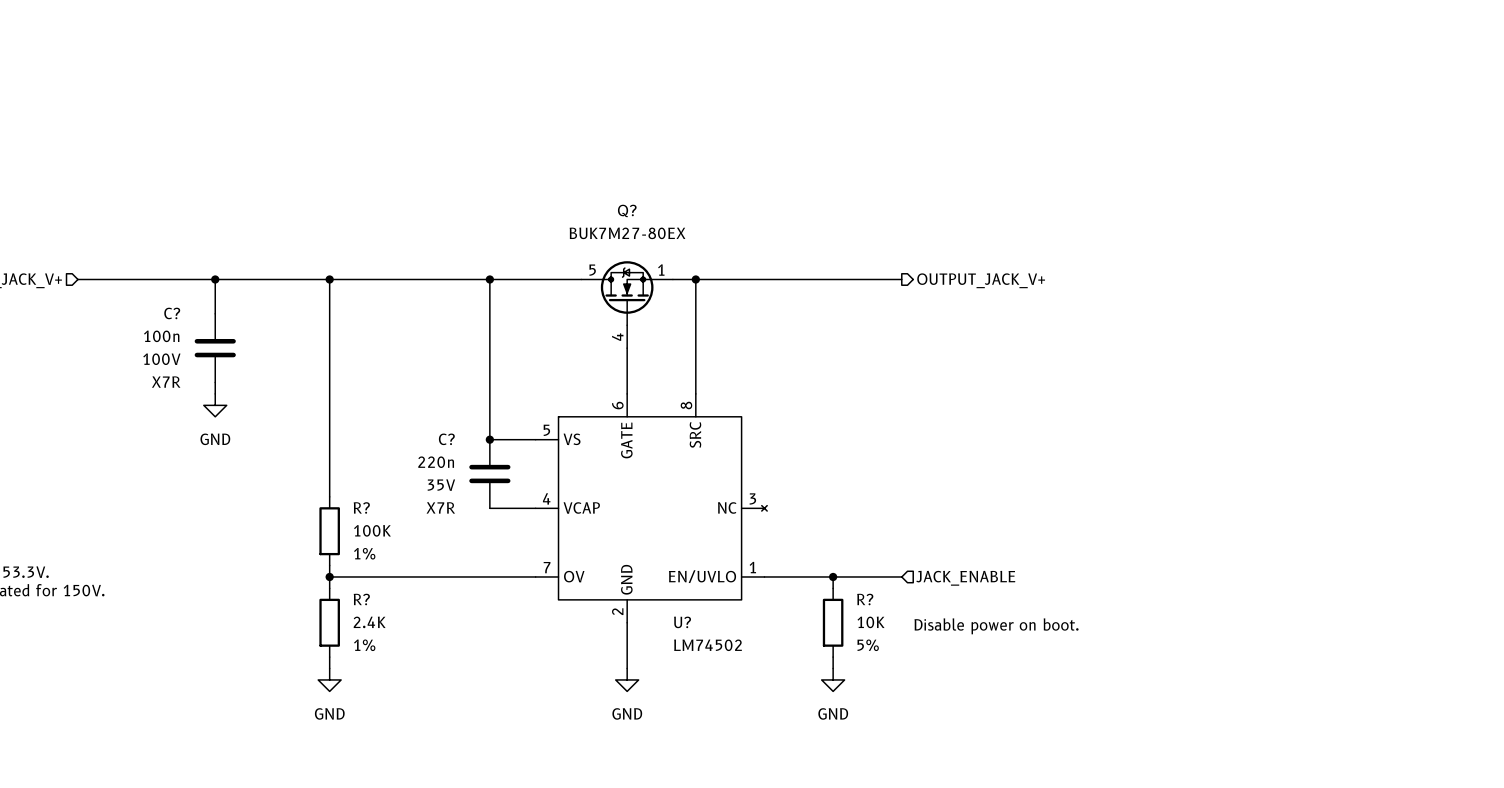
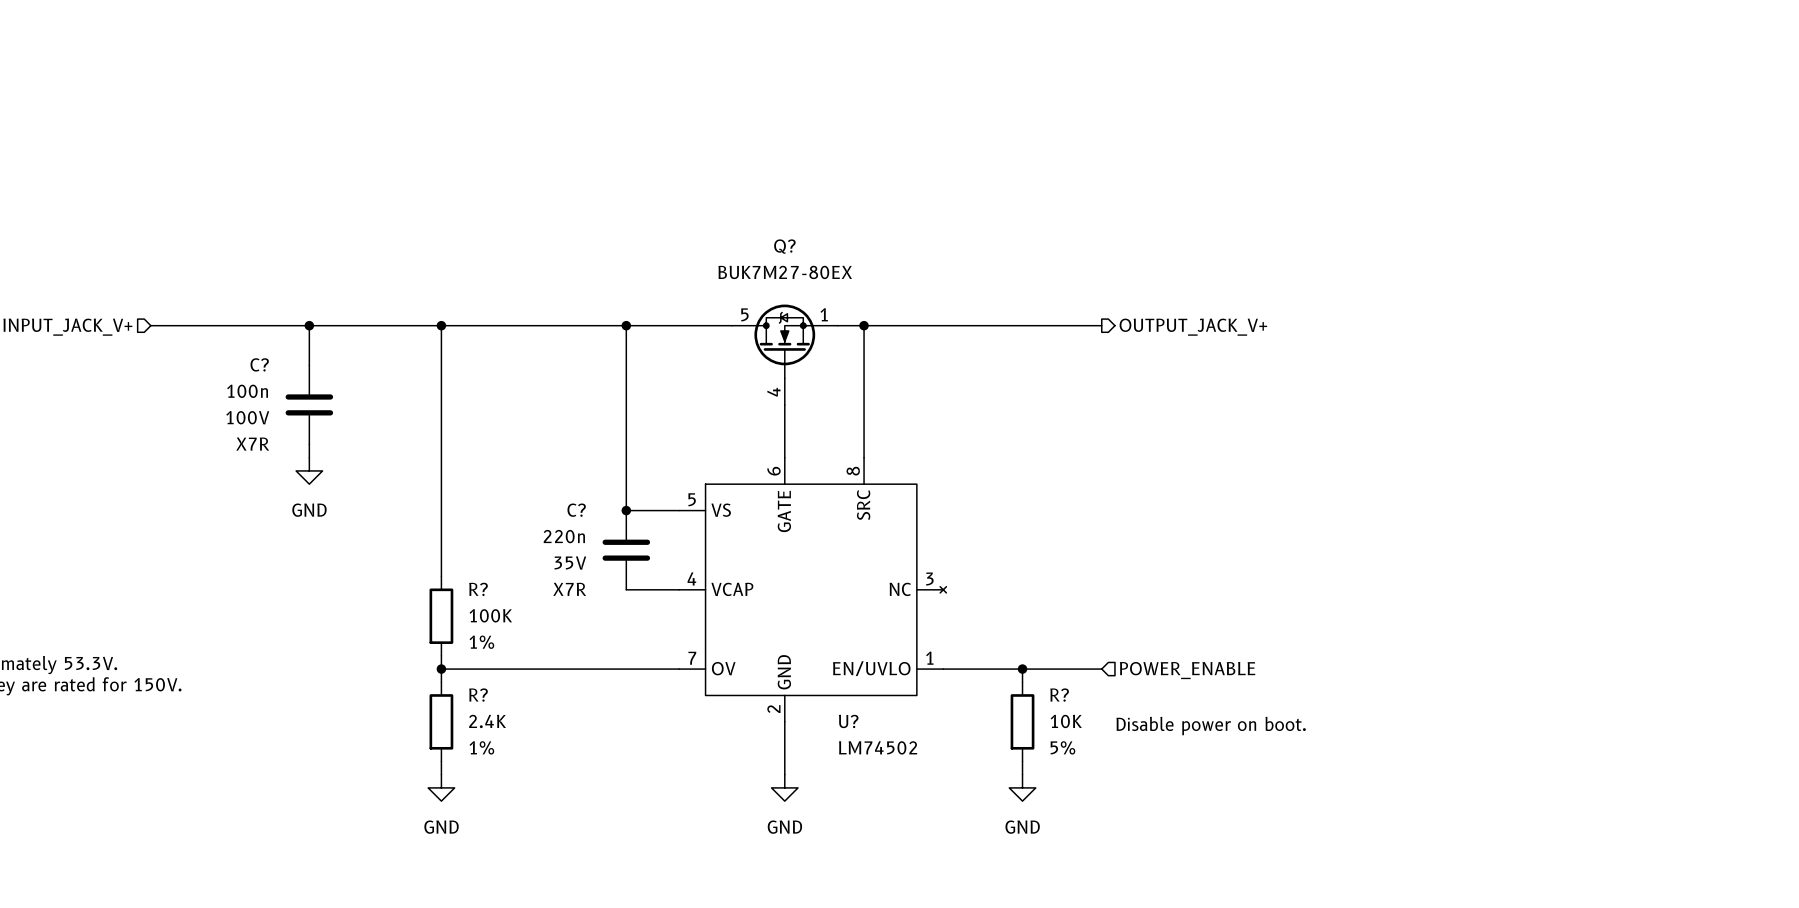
hierarchical label: JACK_ENABLE (965, 578) -> POWER_ENABLE (1187, 670)

